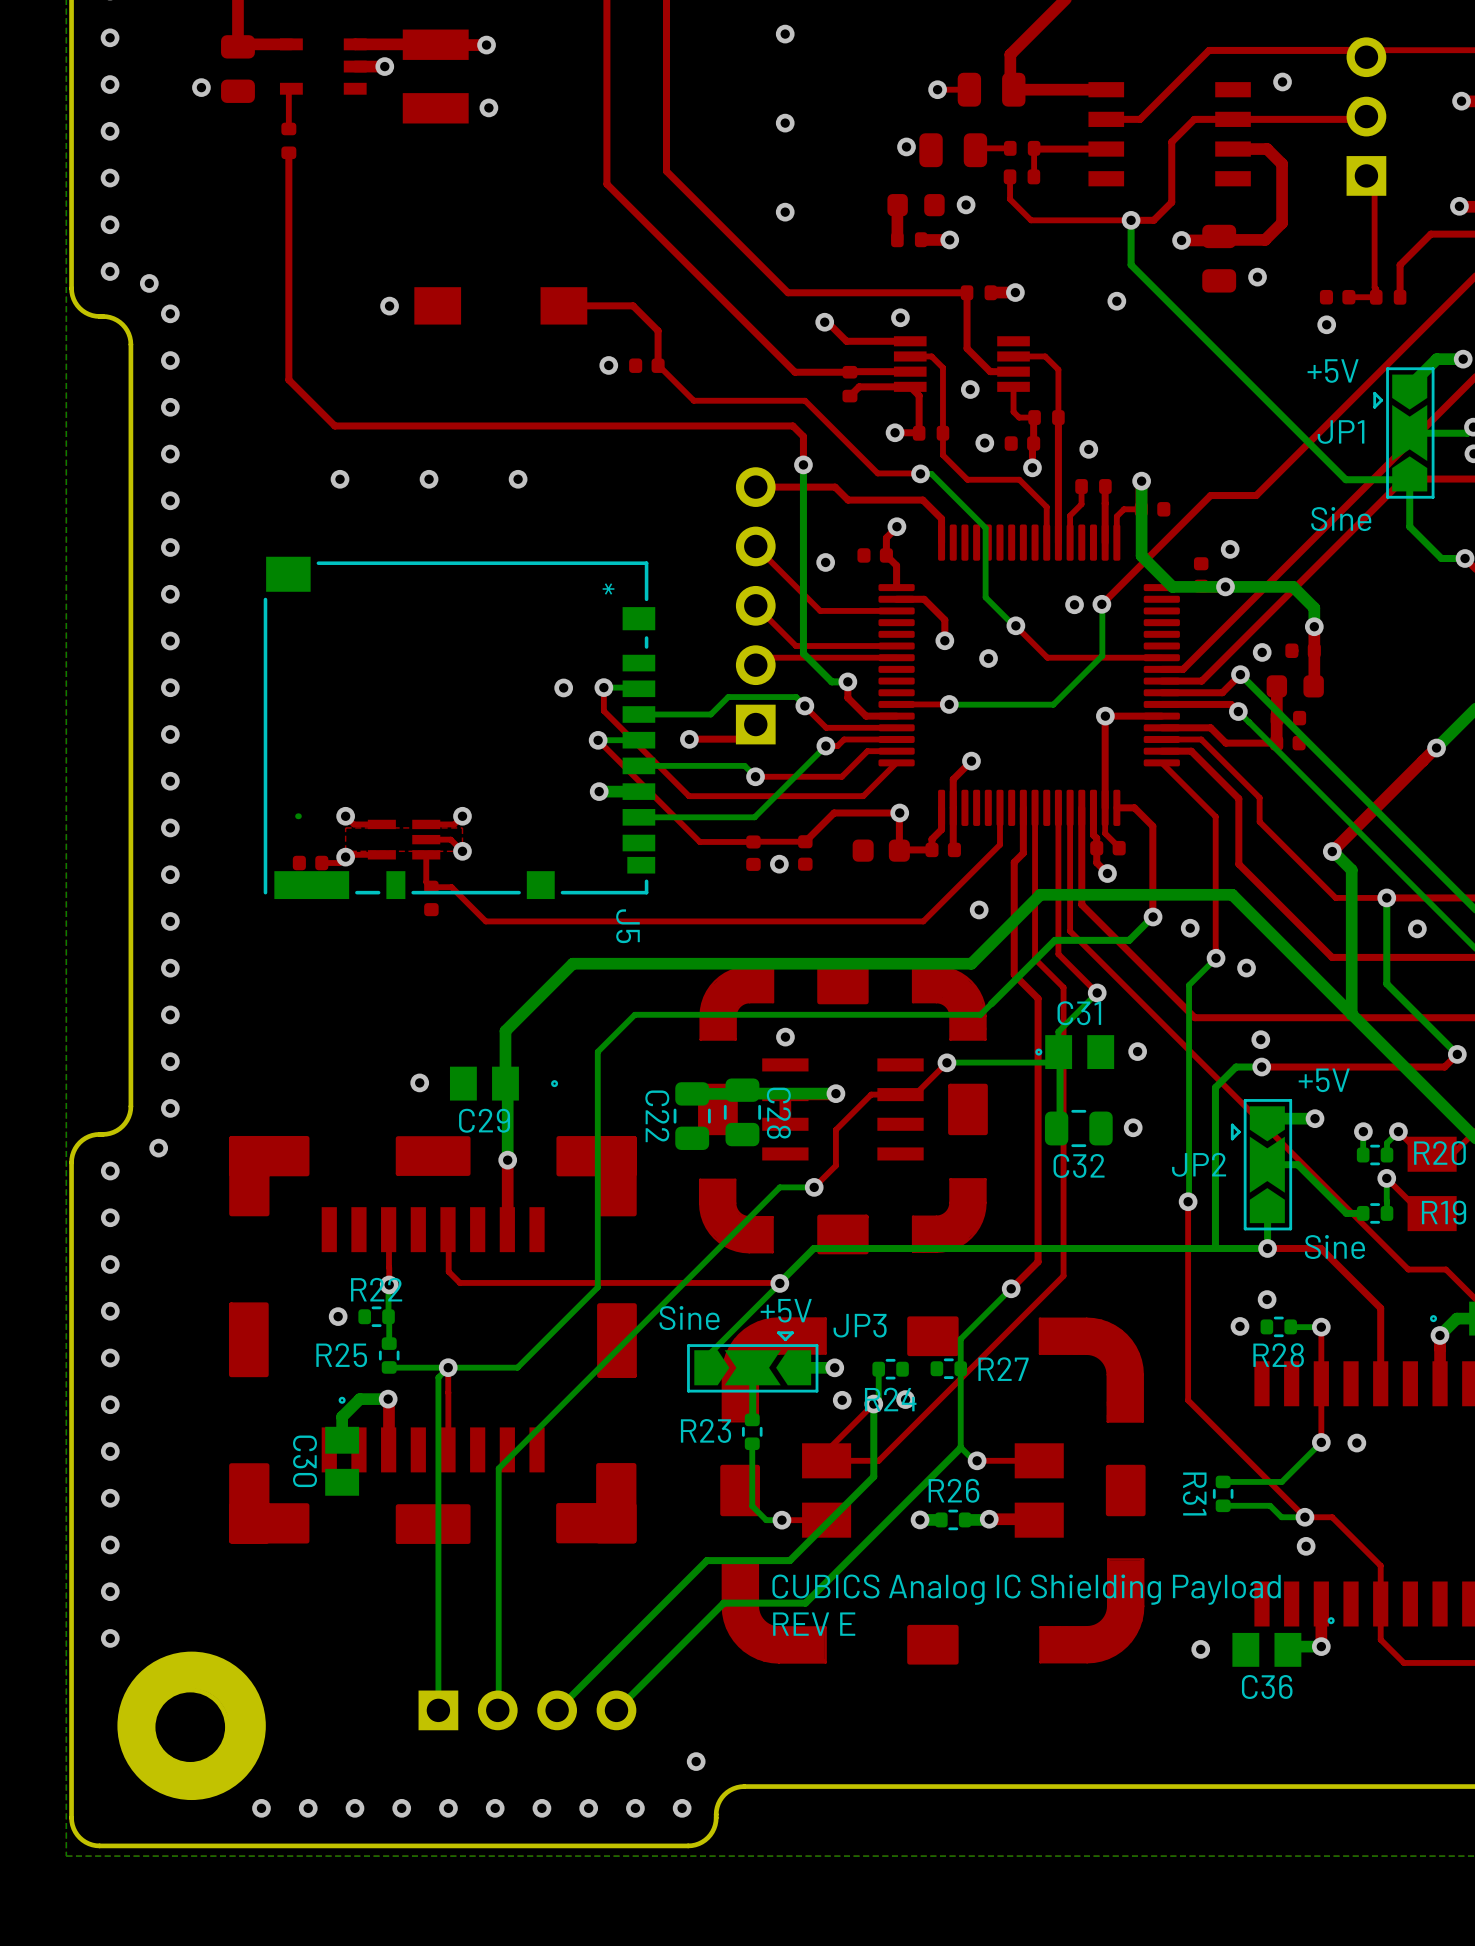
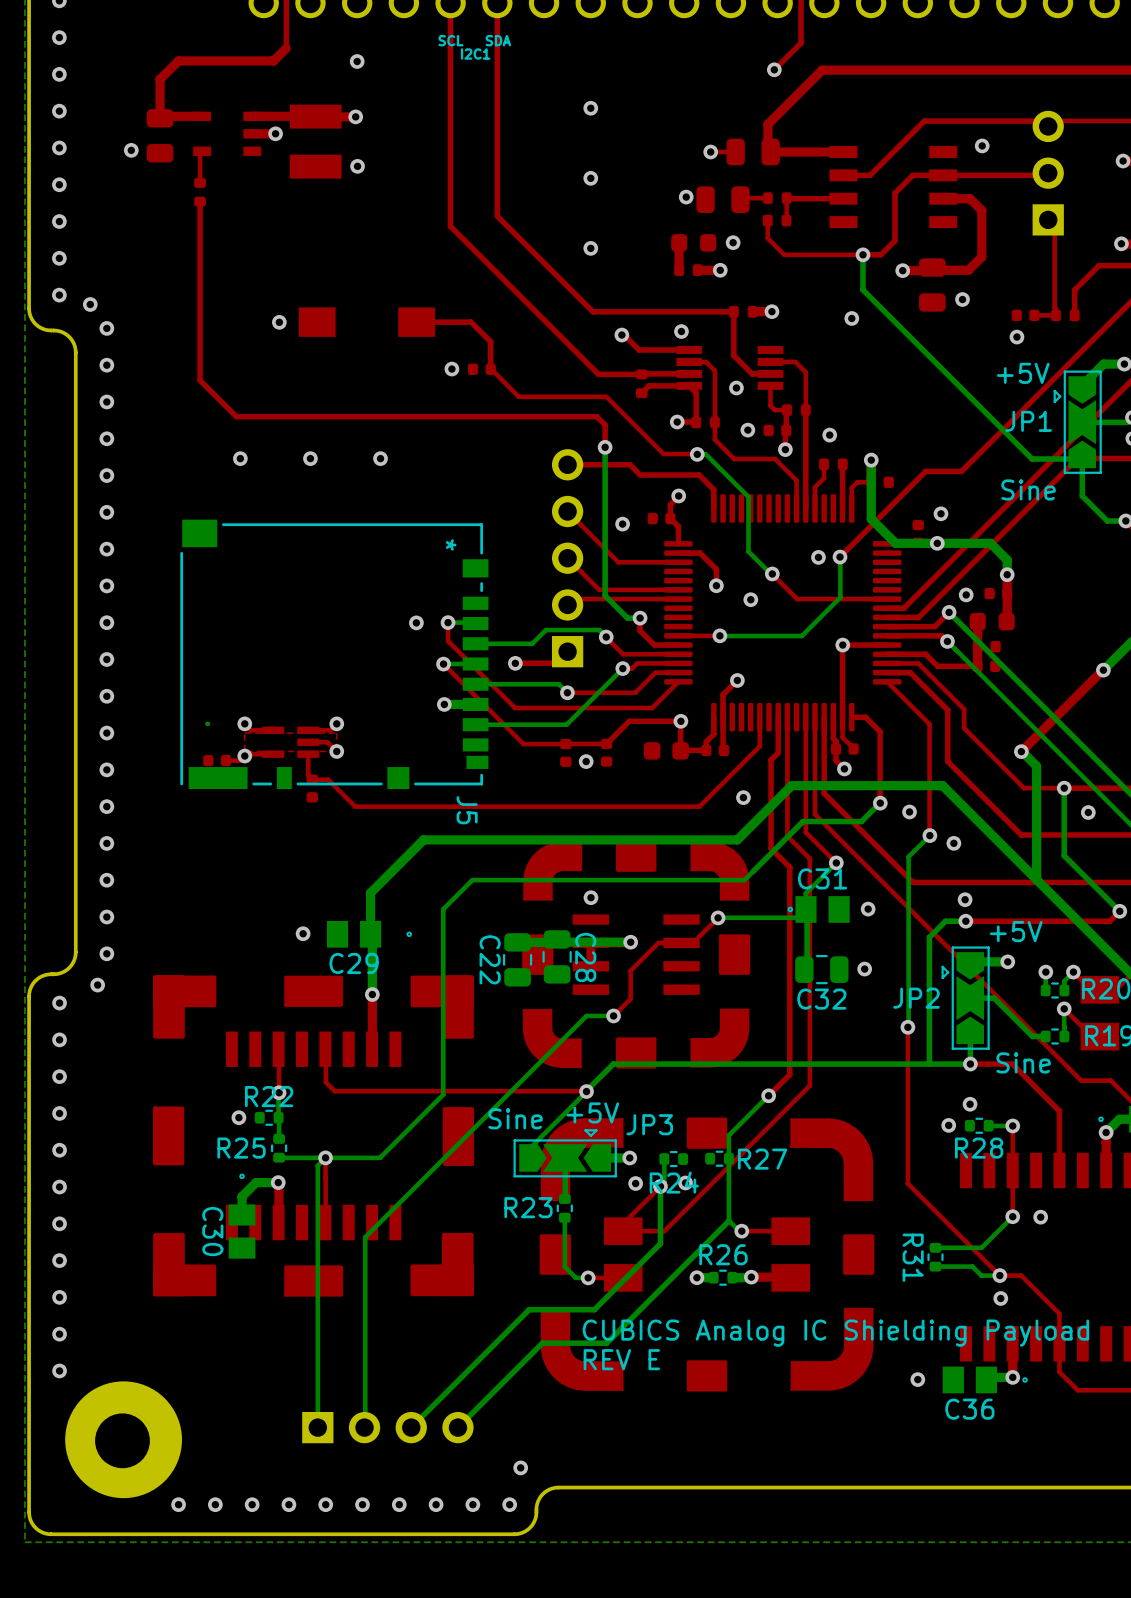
C30 footprint: [325, 1396, 360, 1496] -> [228, 1173, 256, 1259]
C36 footprint: [1232, 1617, 1335, 1667] -> [942, 1366, 1028, 1394]

